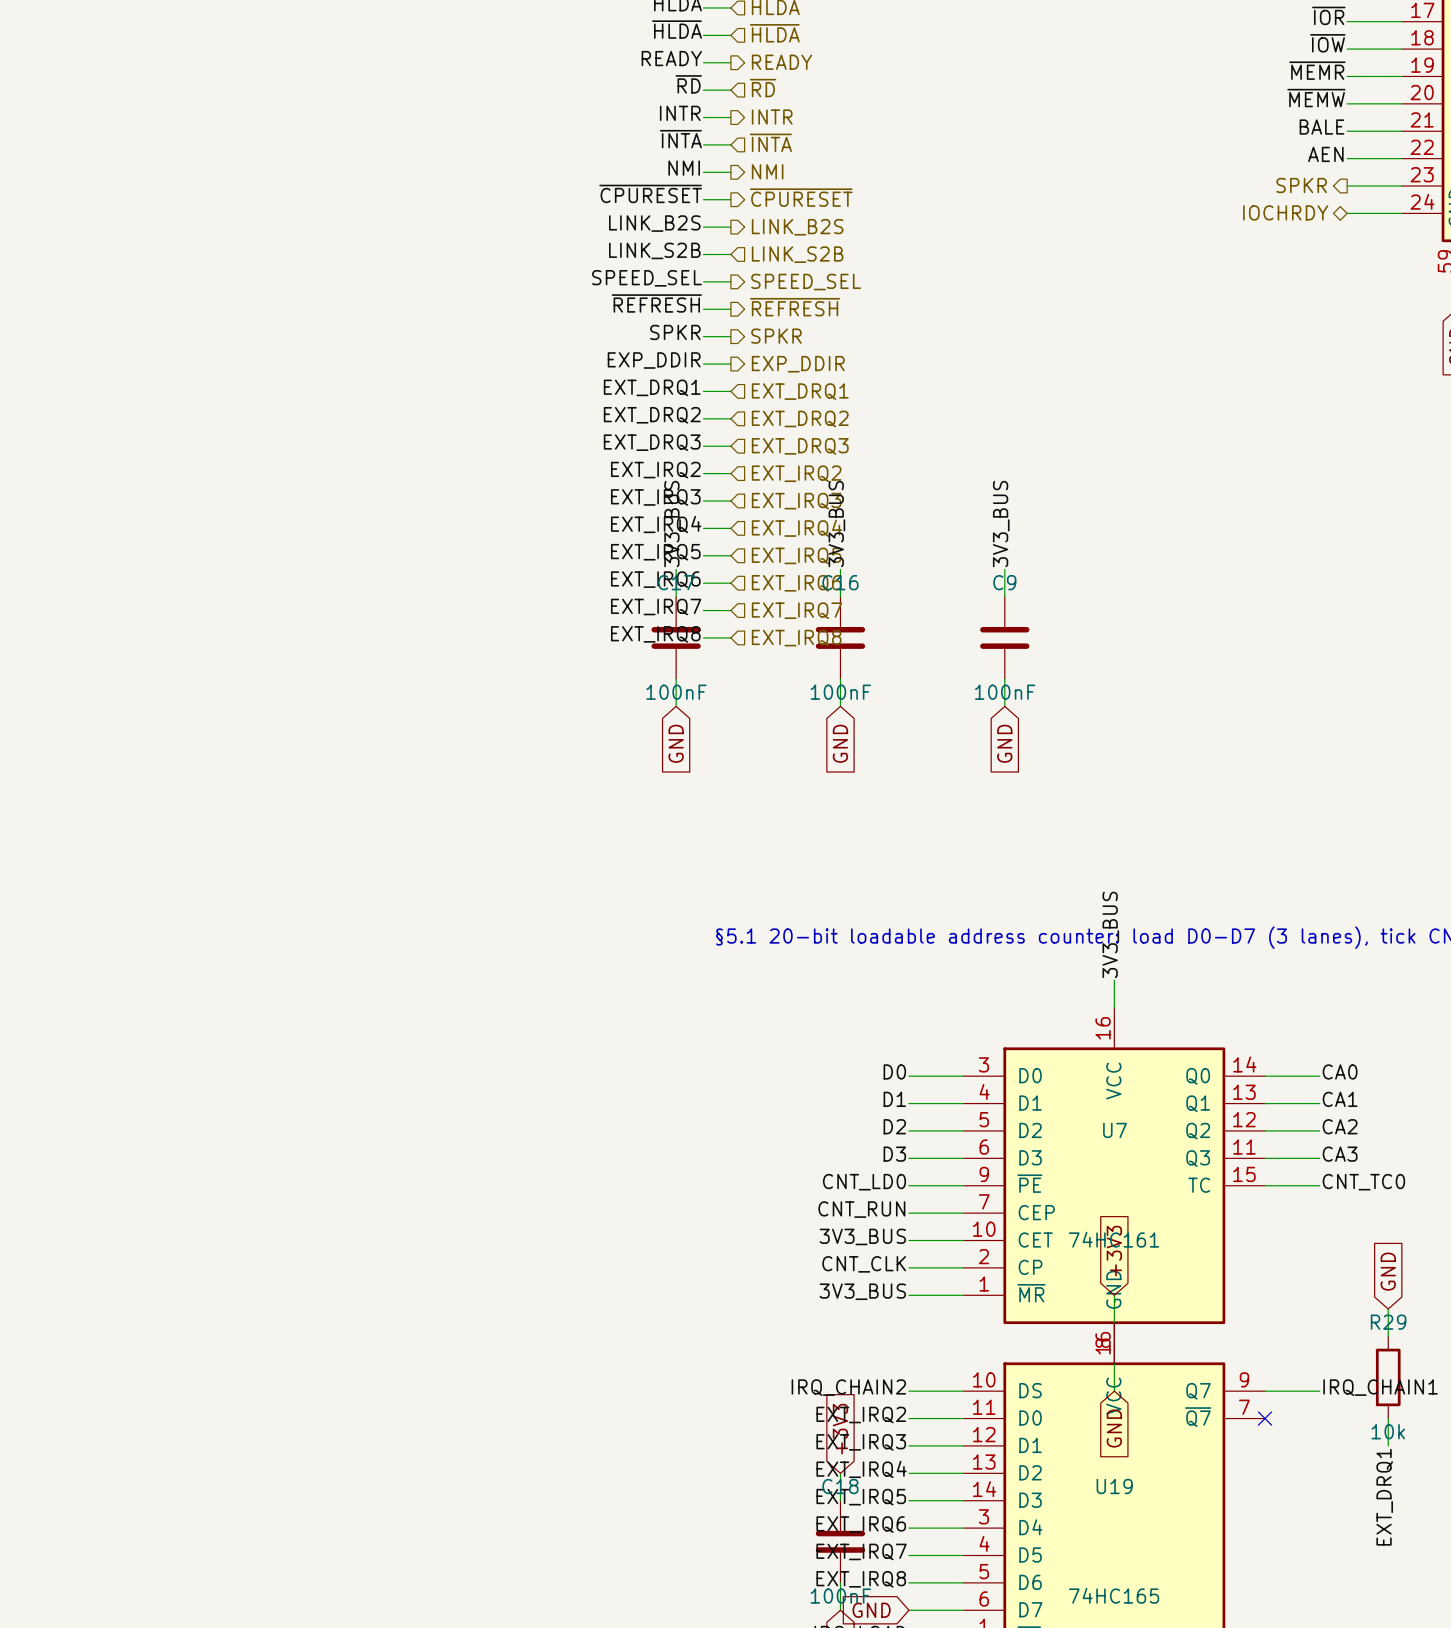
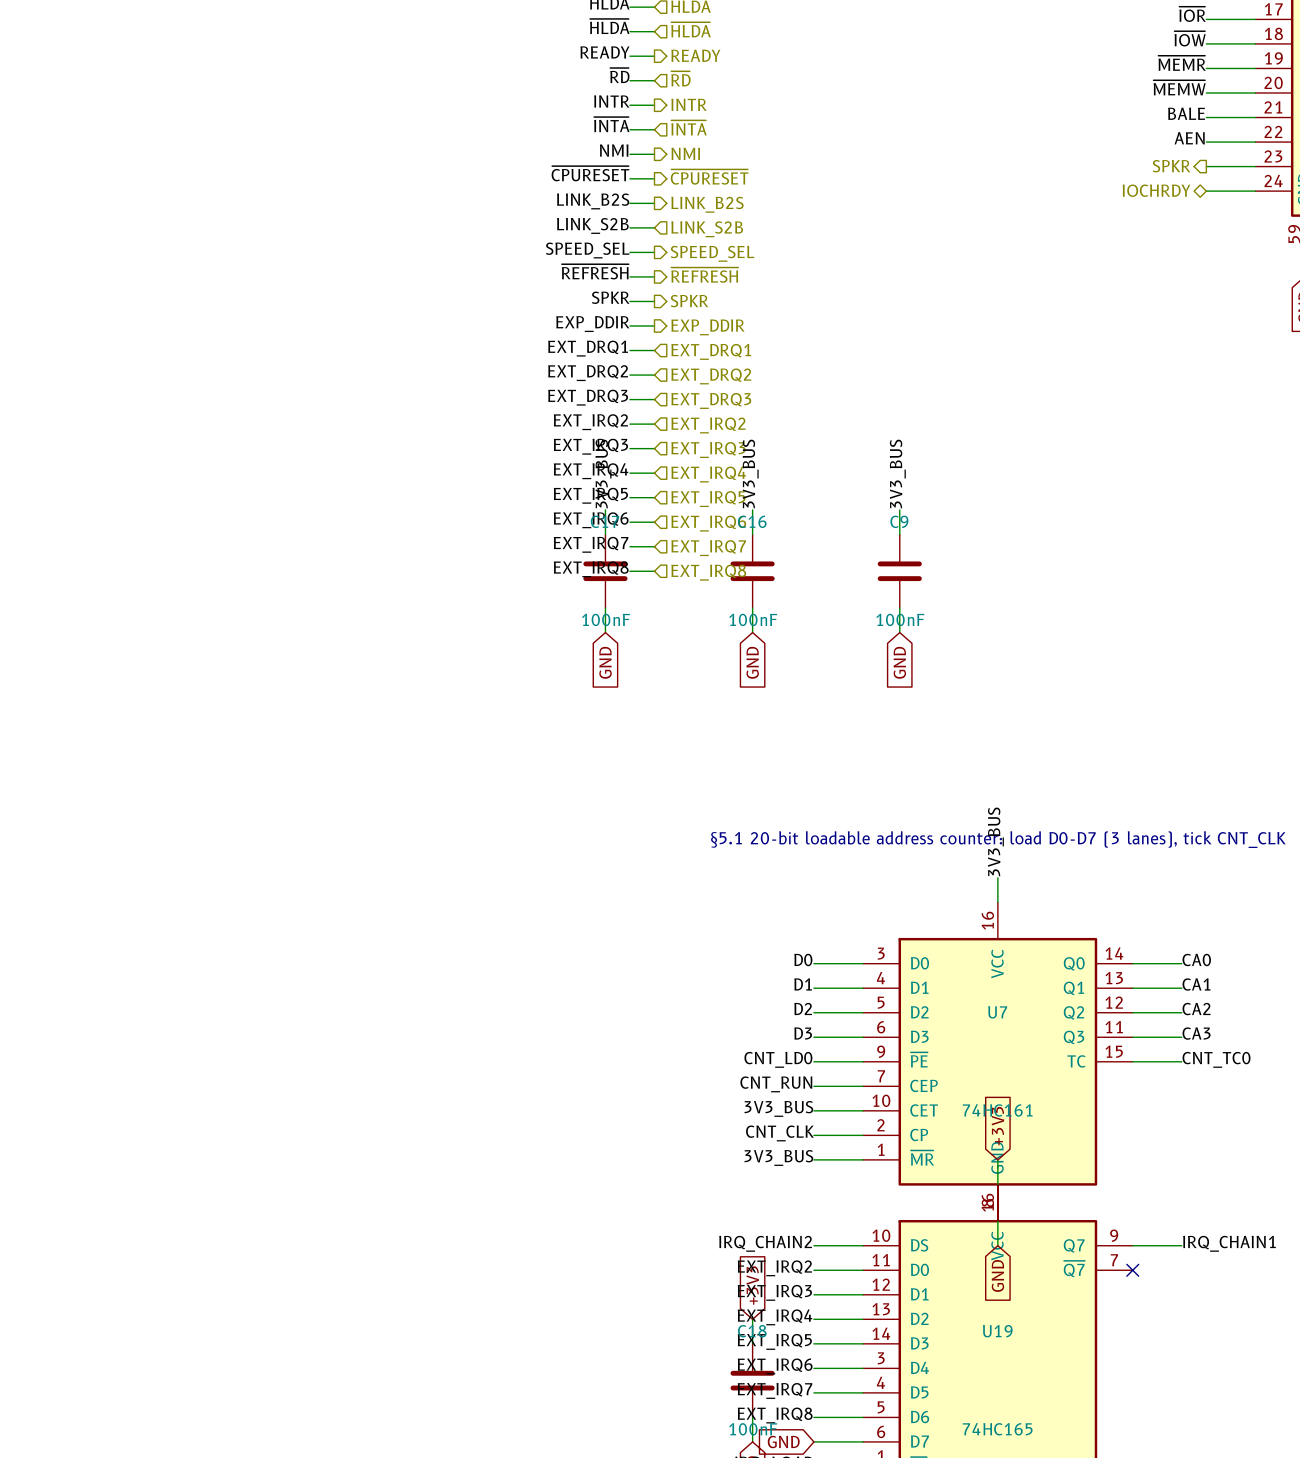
global label: GND (1388, 1271) -> none
wire: (1388, 1308) (1388, 1336) -> none
R29: 10k (1388, 1377) -> none
wire: (1388, 1418) (1388, 1445) -> none
label: EXT_DRQ1 (1384, 1497) -> none

